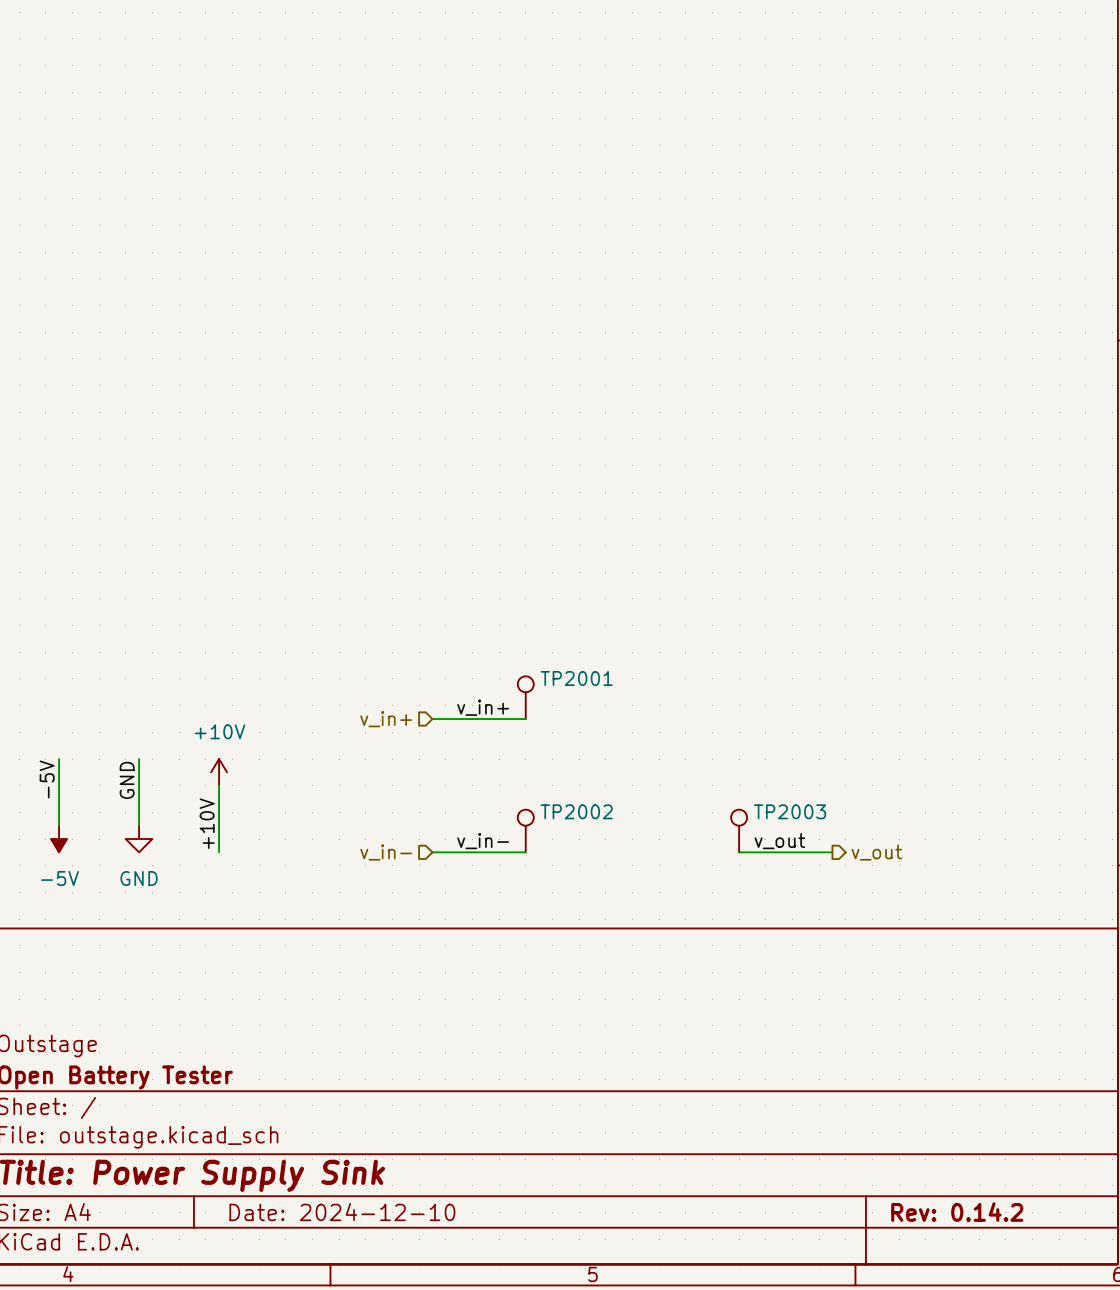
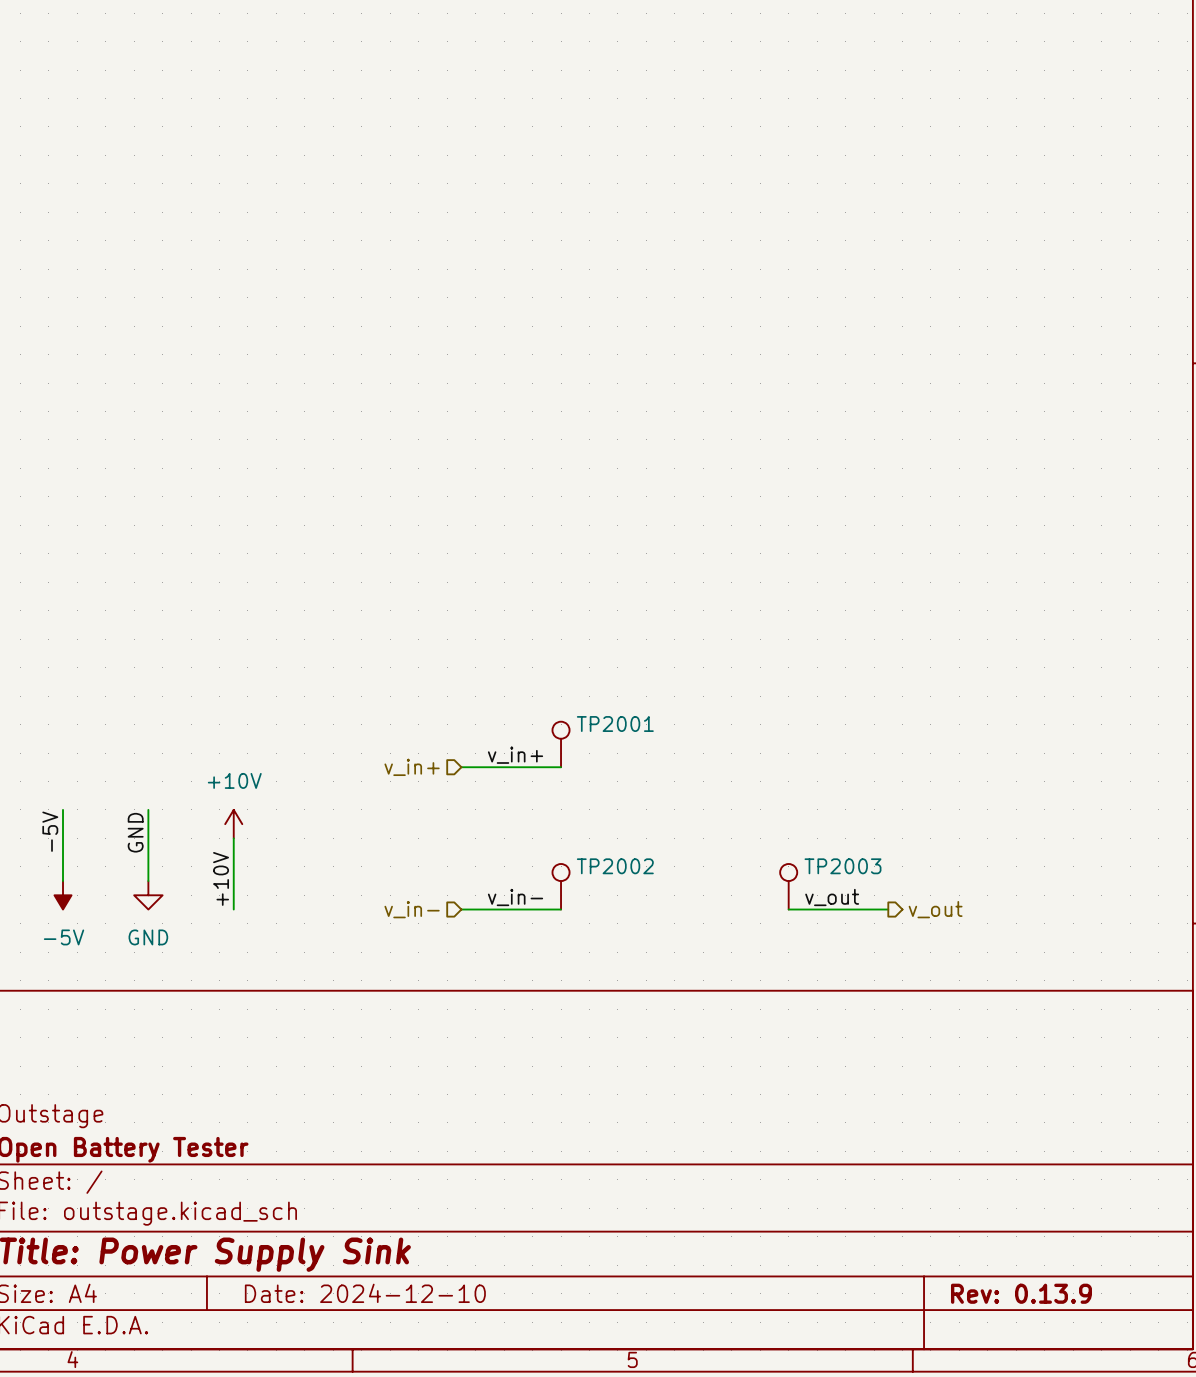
title block: Rev: 0.14.2 (957, 1212) -> Rev: 0.13.9 (1021, 1293)

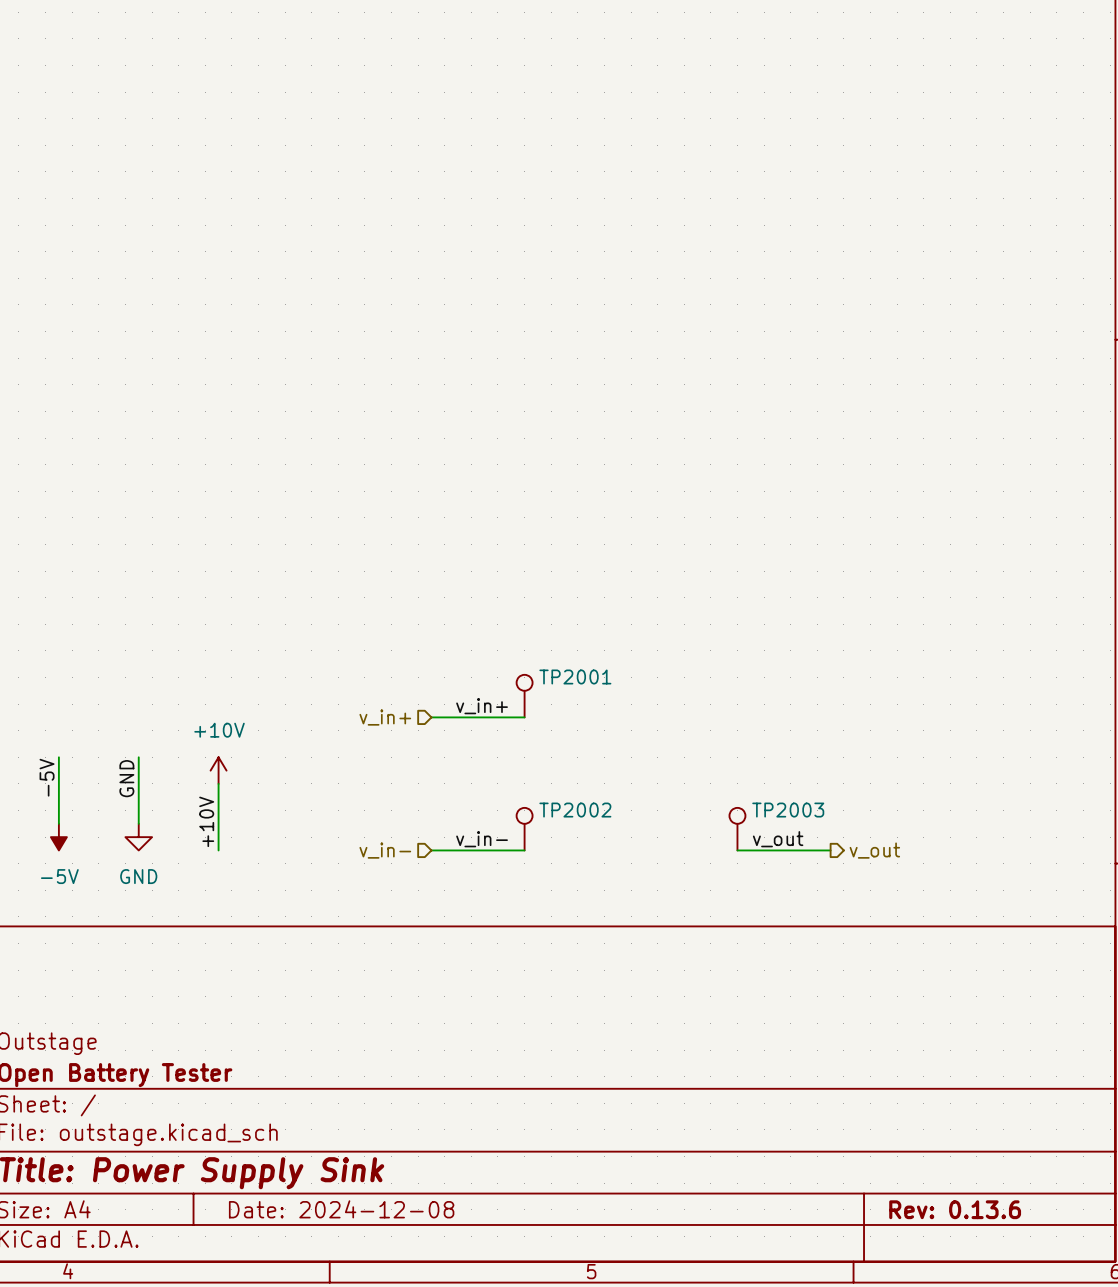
title block: Date: 2024-12-10 (365, 1293) -> Date: 2024-12-08 (341, 1209)
title block: Rev: 0.13.9 (1021, 1293) -> Rev: 0.13.6 (955, 1209)

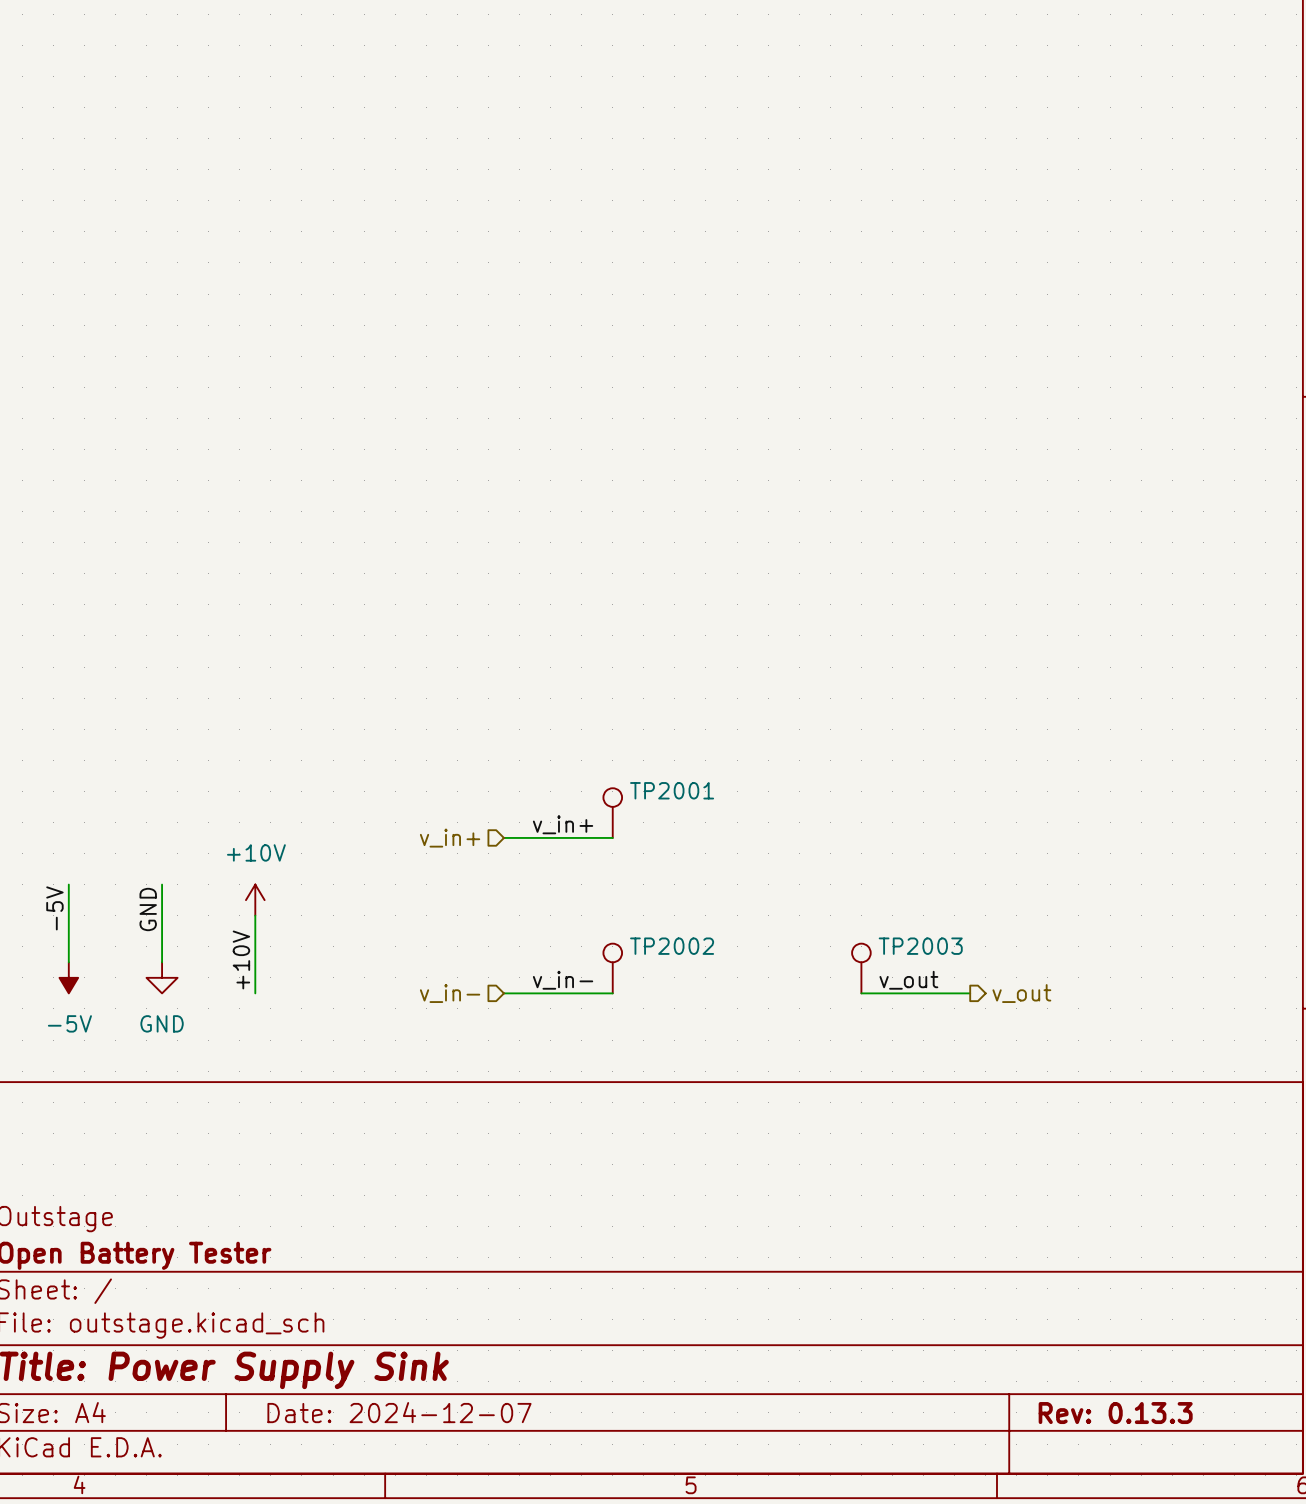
title block: Date: 2024-12-08 (341, 1209) -> Date: 2024-12-07 (399, 1412)
title block: Rev: 0.13.6 (955, 1209) -> Rev: 0.13.3 (1115, 1413)

